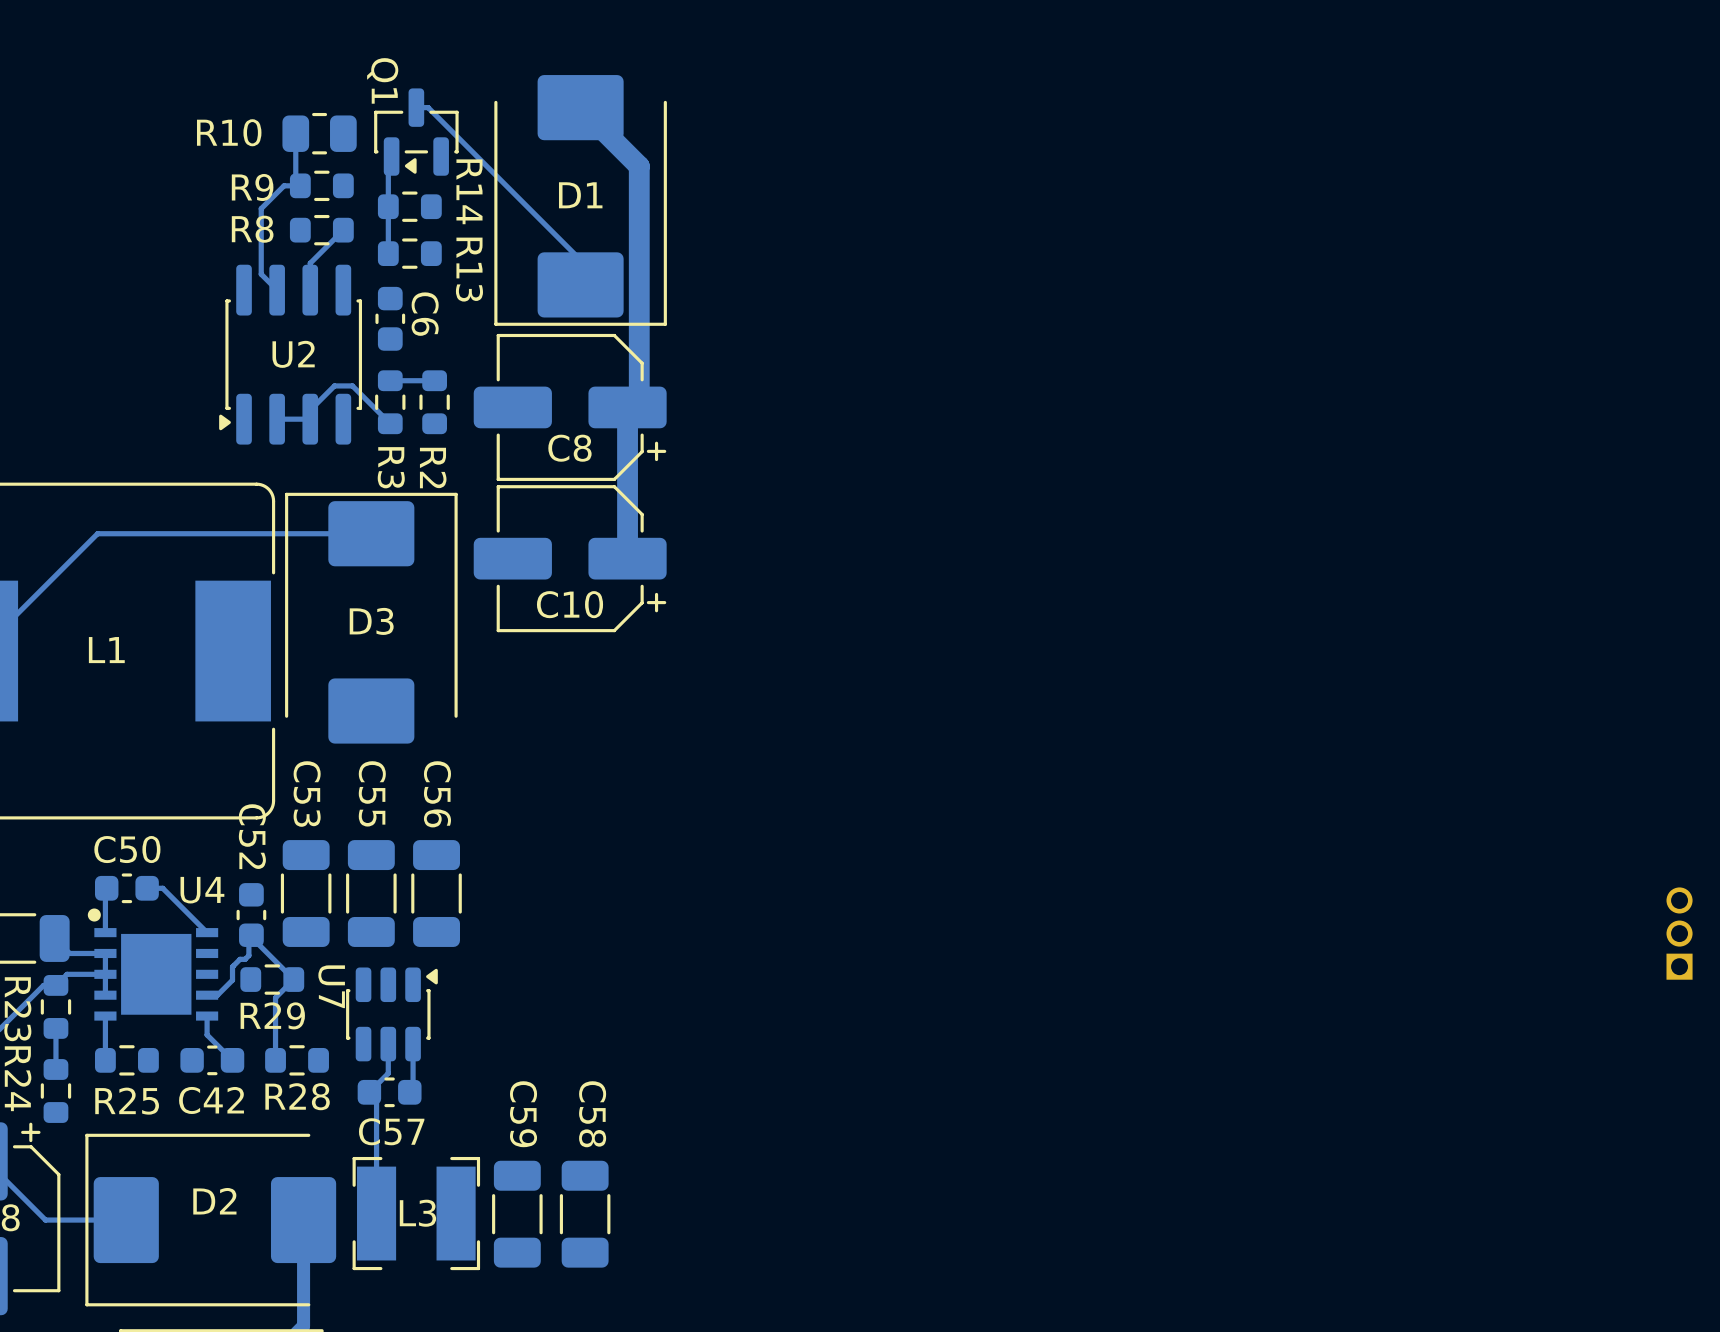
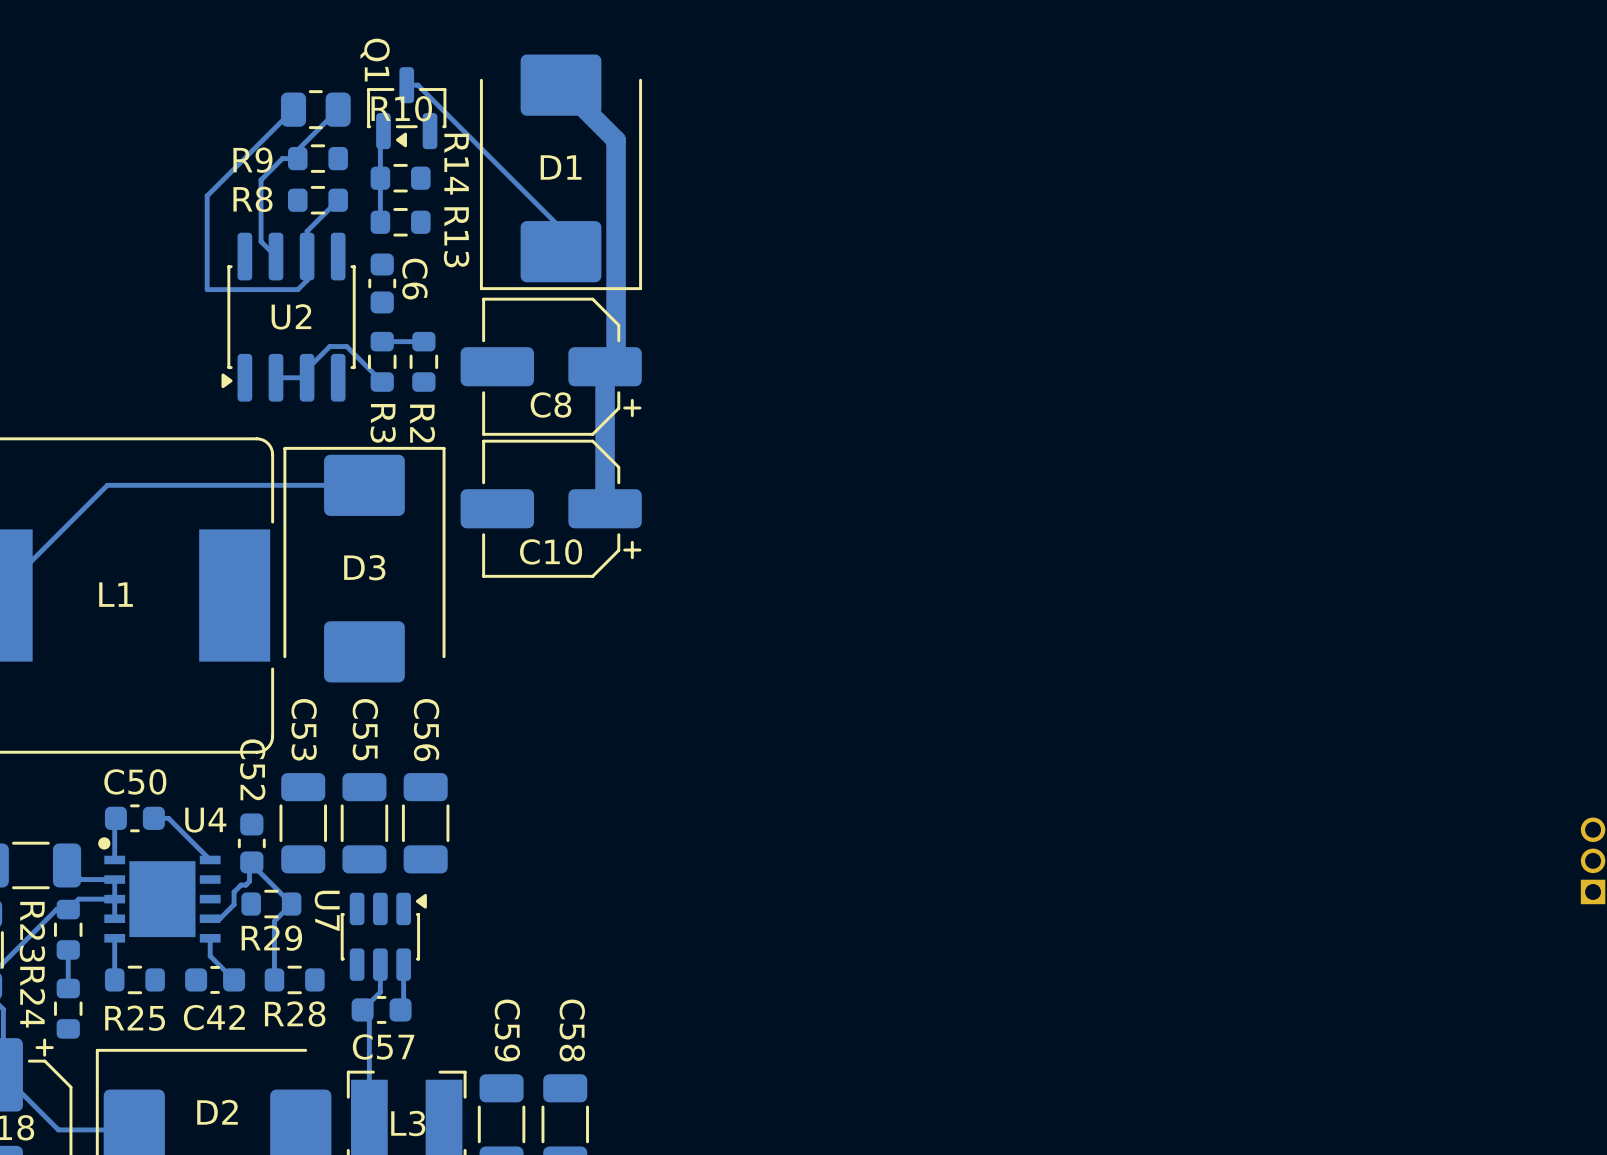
R10 name position: R10 (229, 132) -> R10 (401, 108)
track: (295, 133) (295, 181) -> (293, 109) (207, 195) (207, 289) (297, 289) (307, 280) (307, 256)
track: none -> (338, 109) (297, 150) (297, 158)

